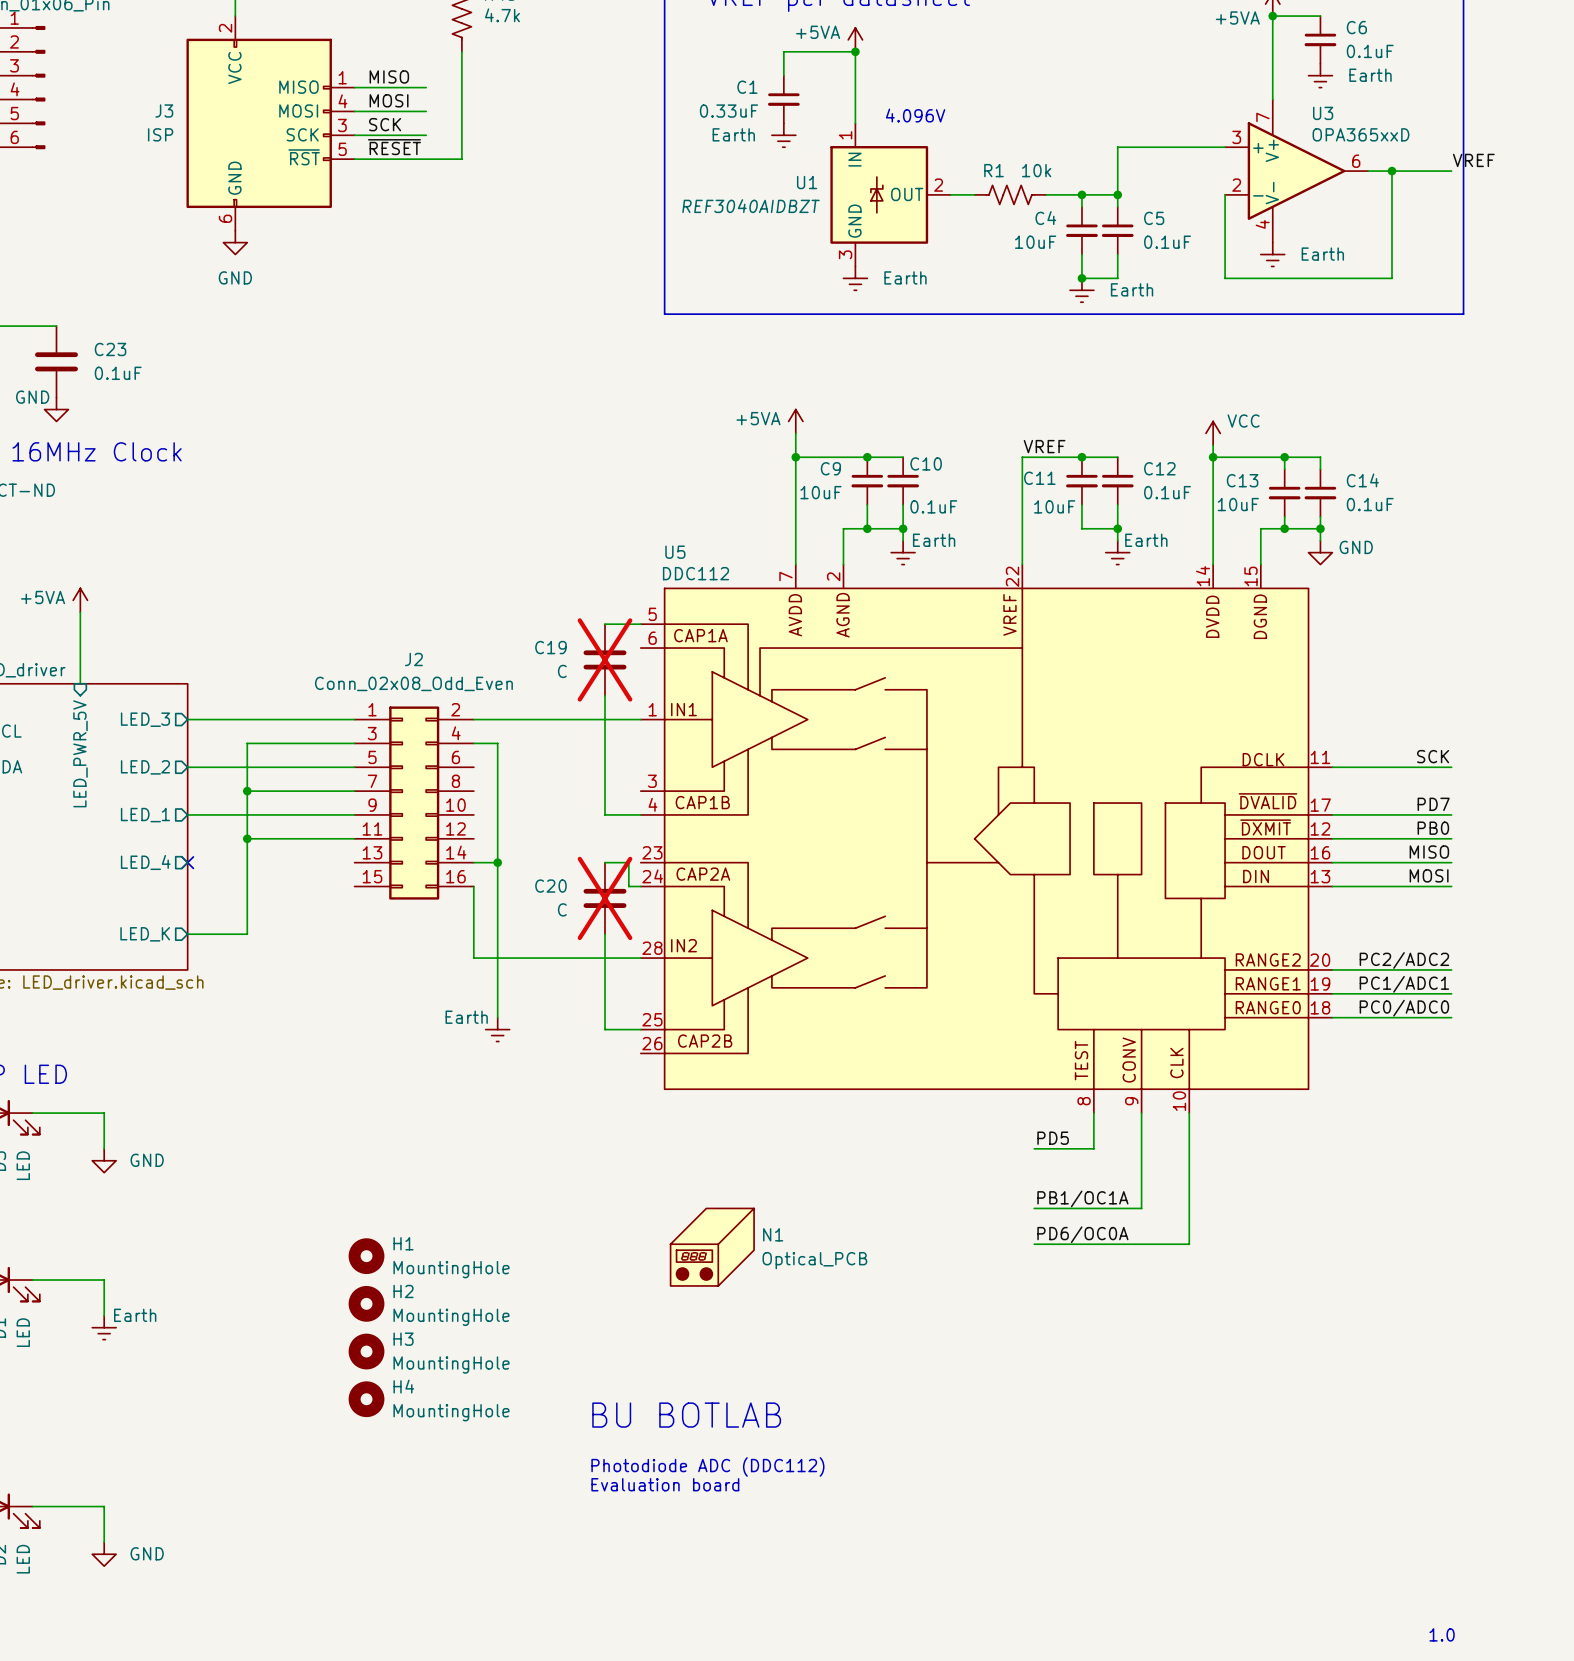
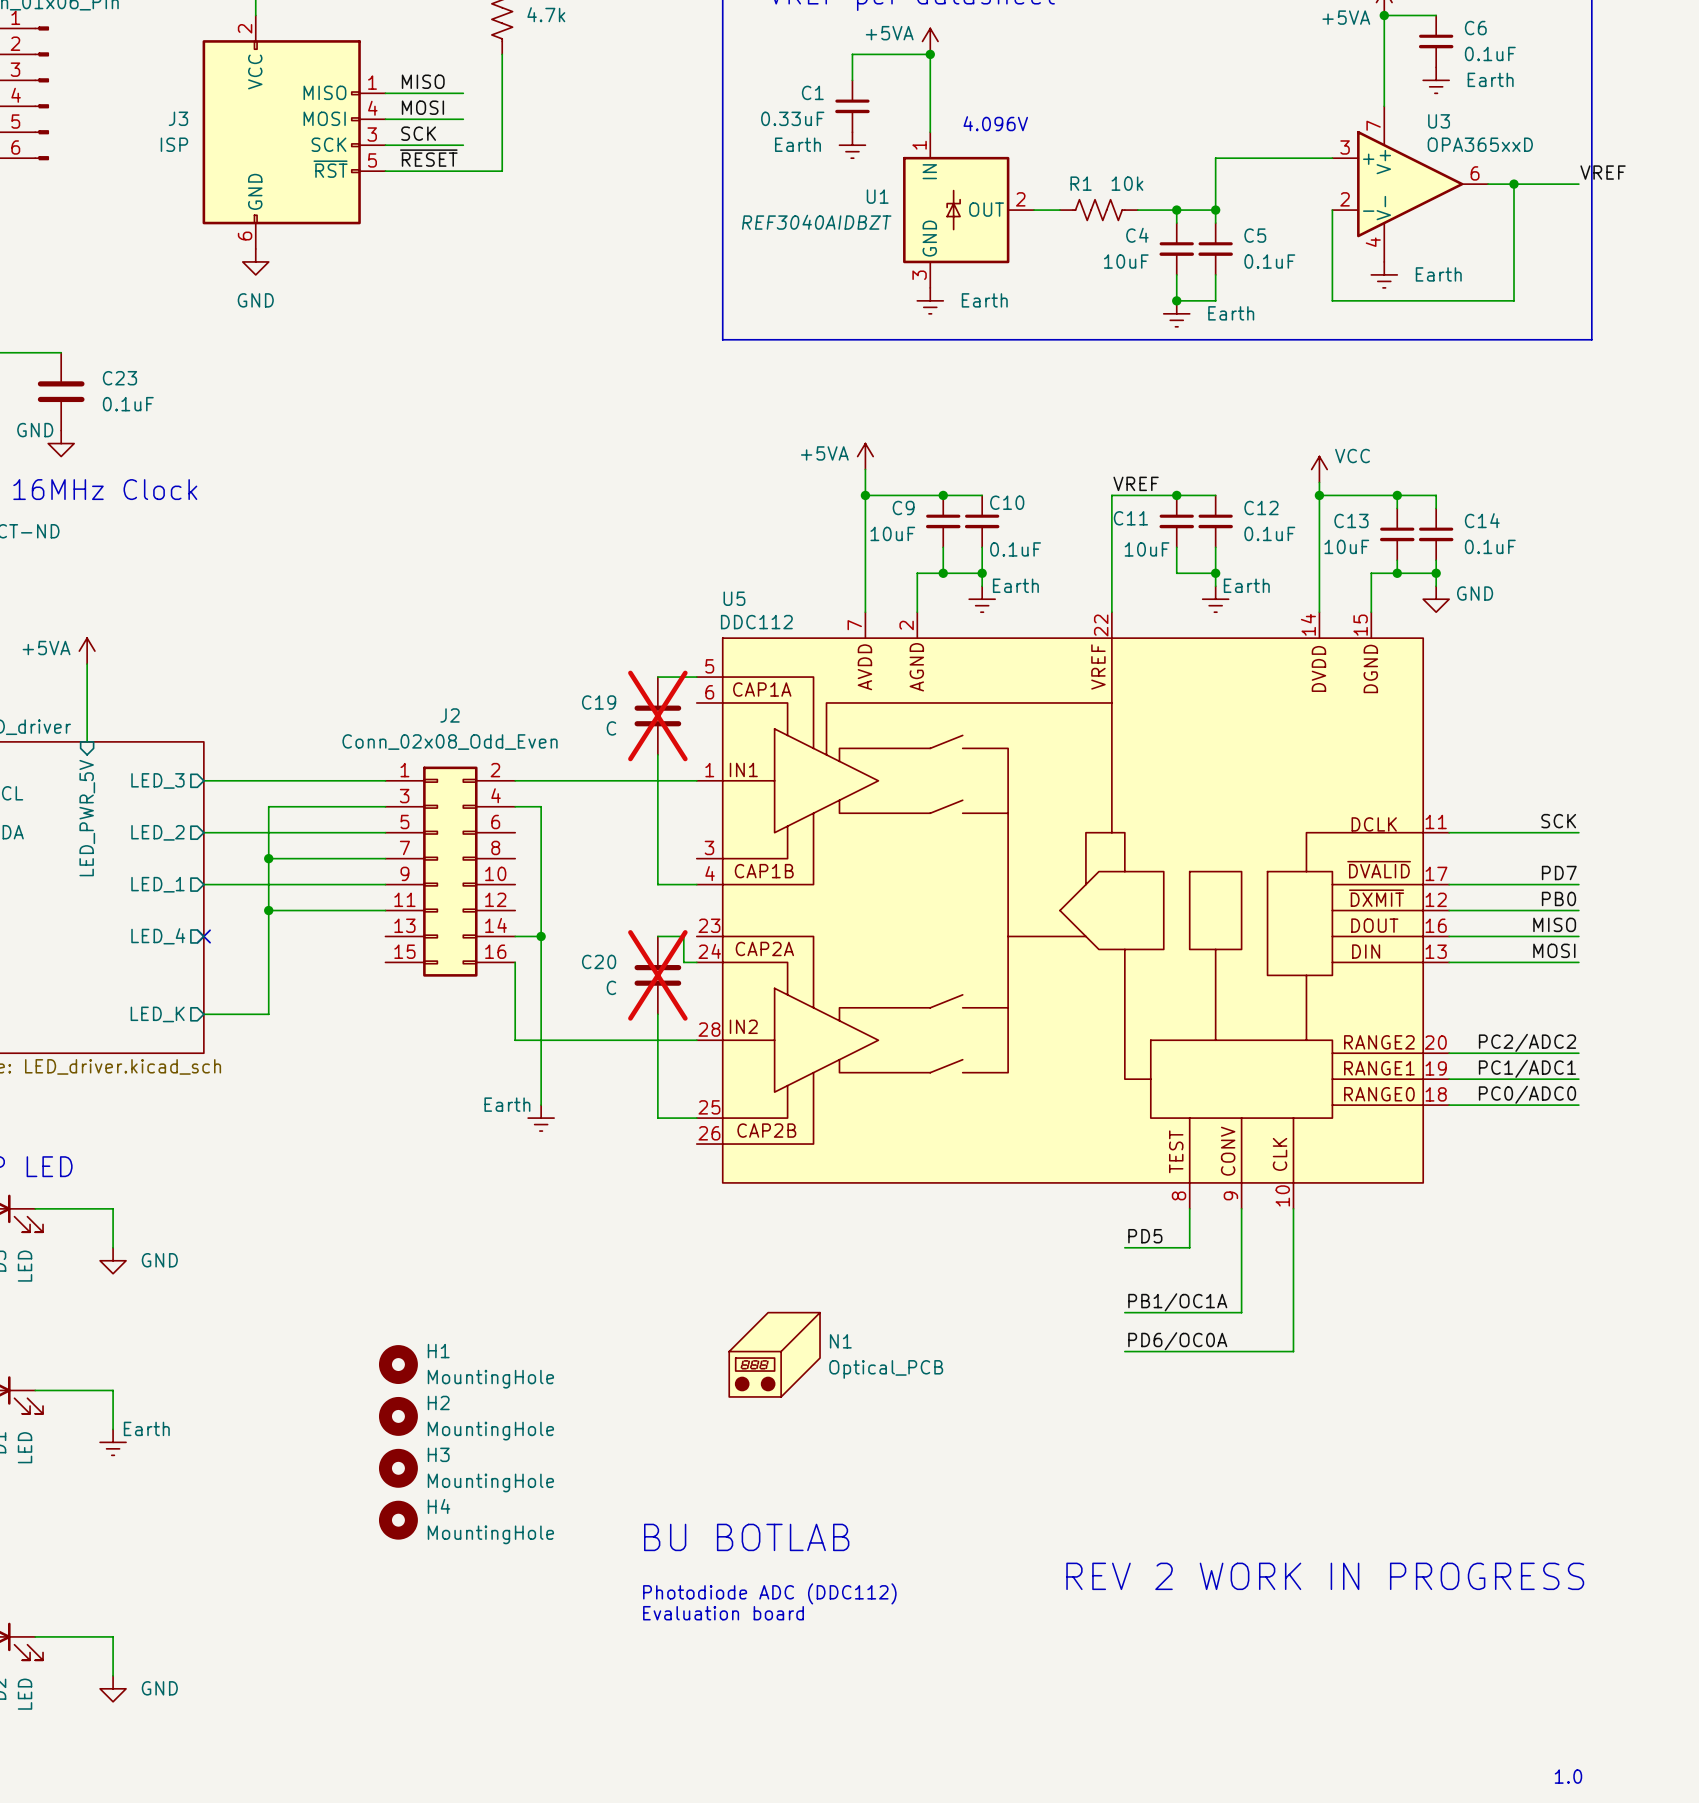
text: none -> REV 2 WORK IN PROGRESS (1325, 1576)

